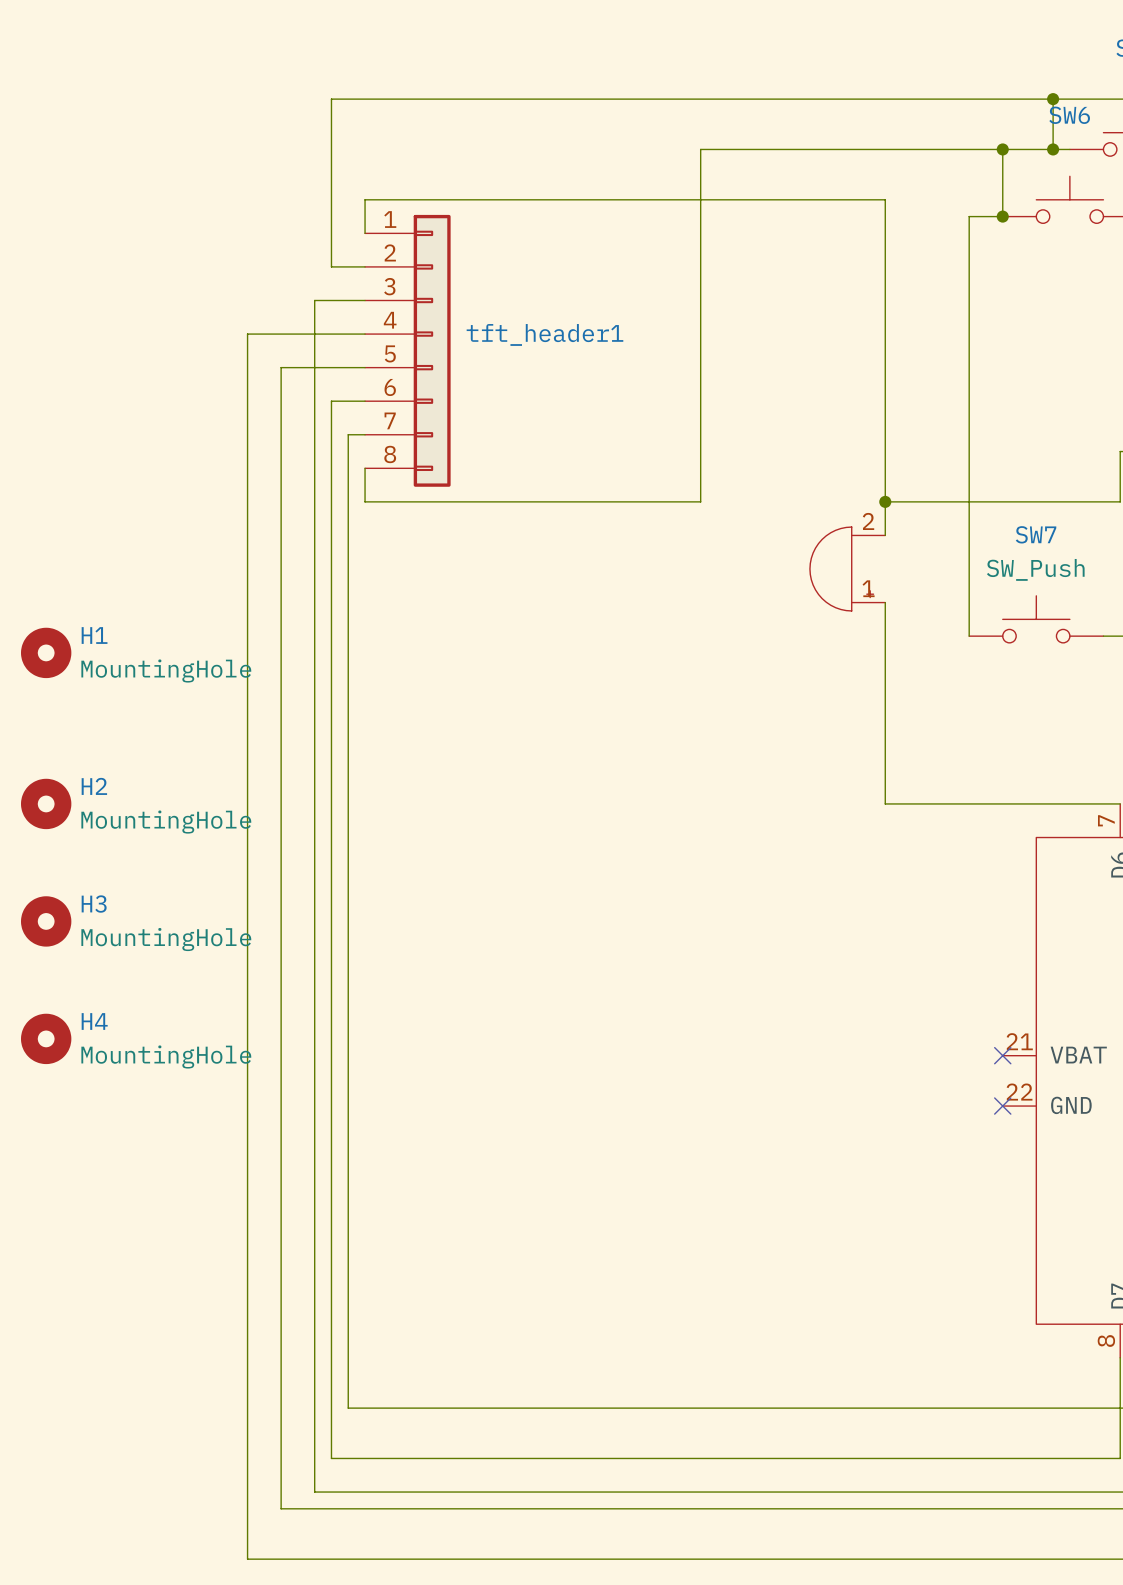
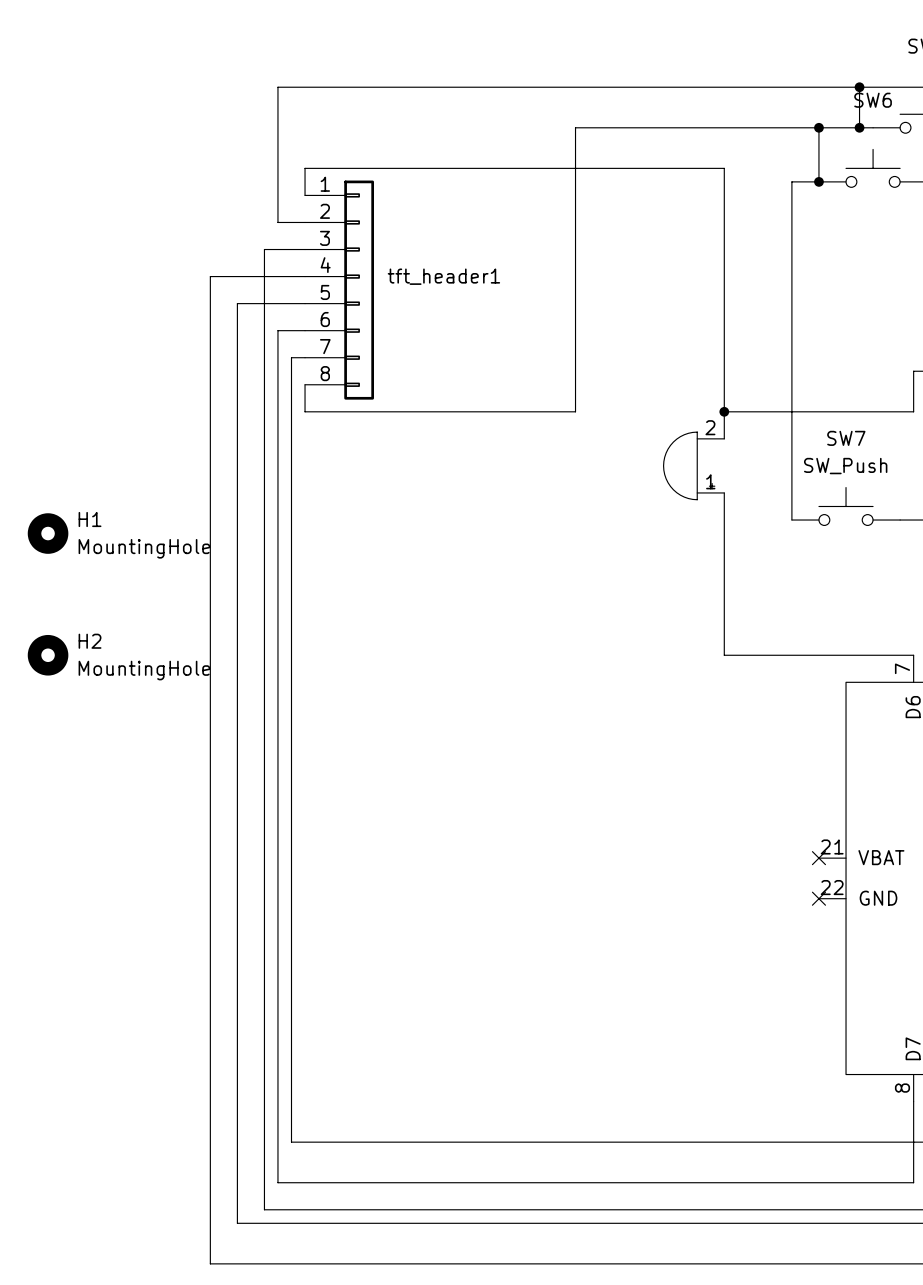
H3: MountingHole (46, 921) -> none
H4: MountingHole (46, 1038) -> none

